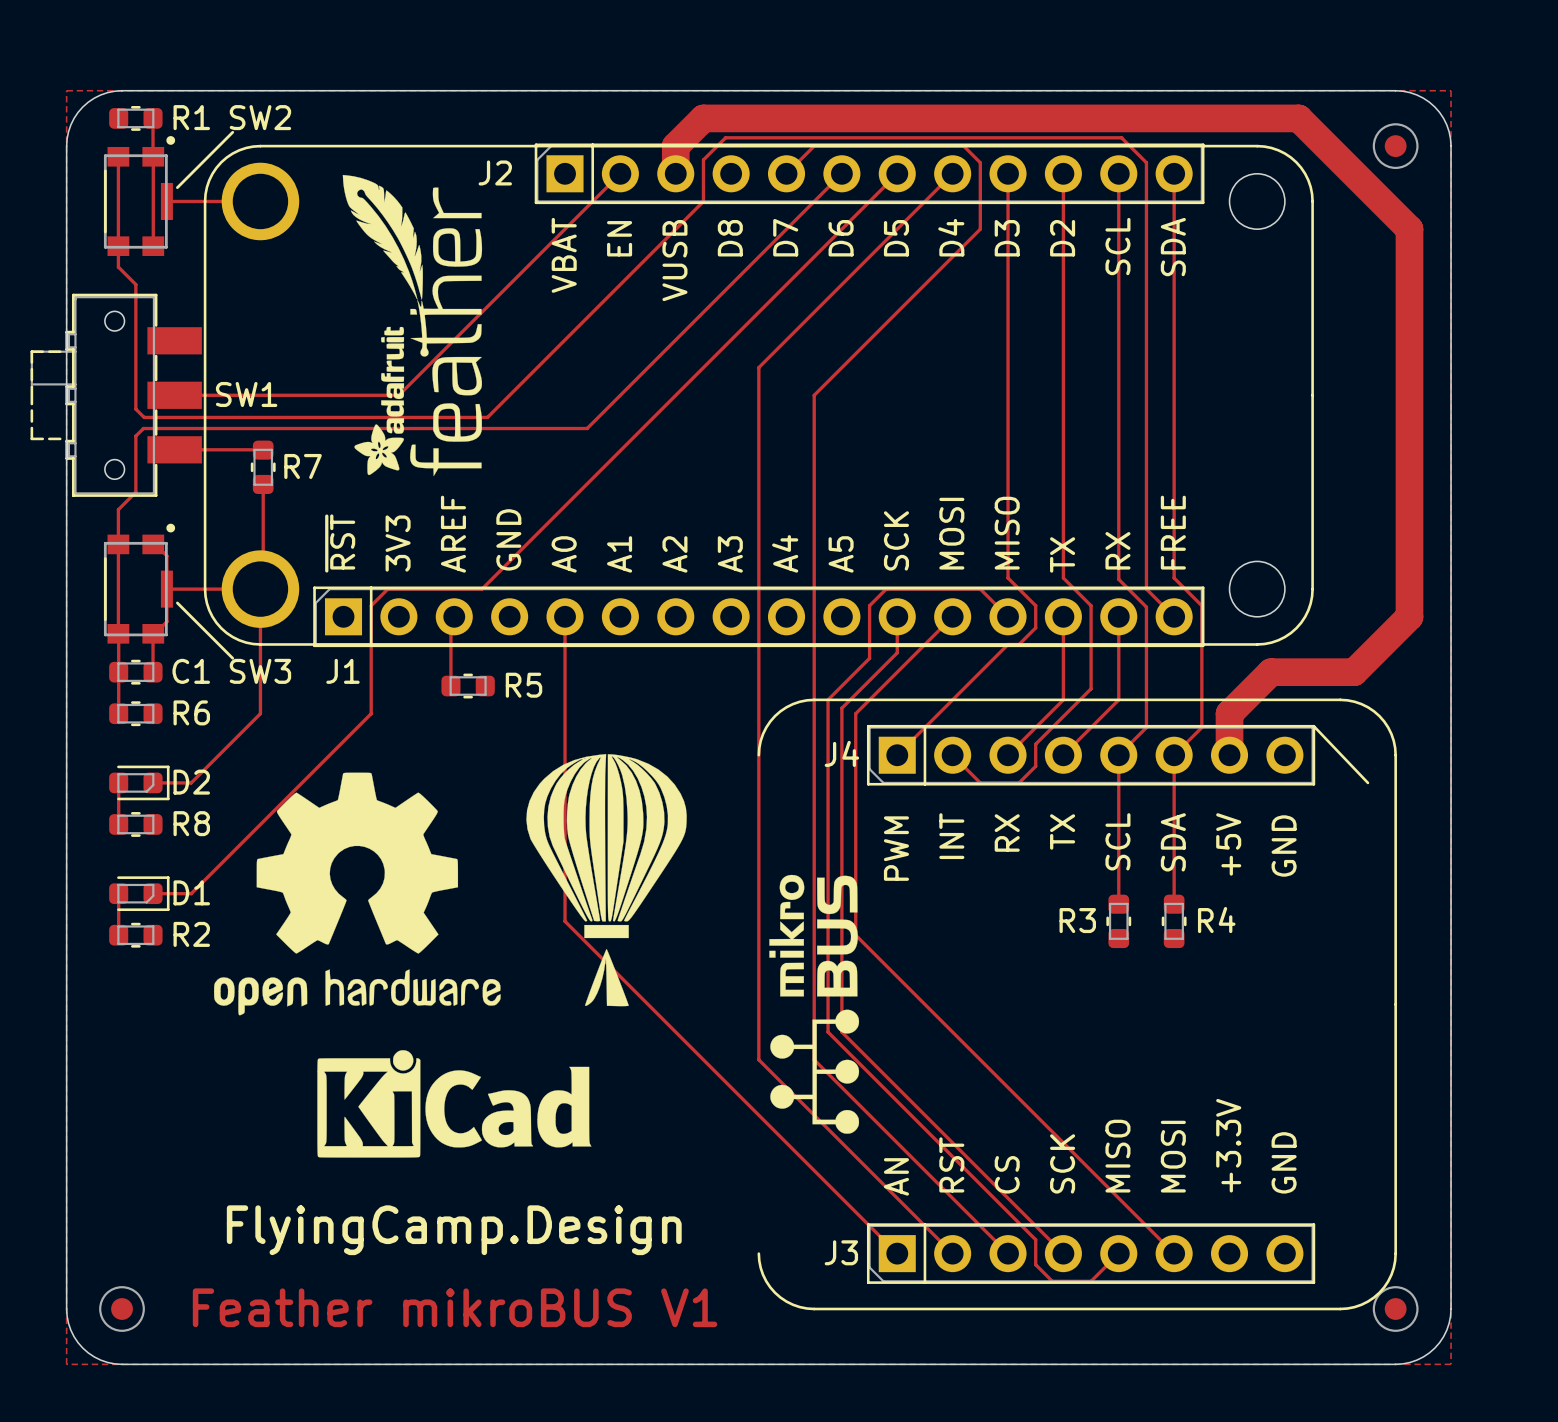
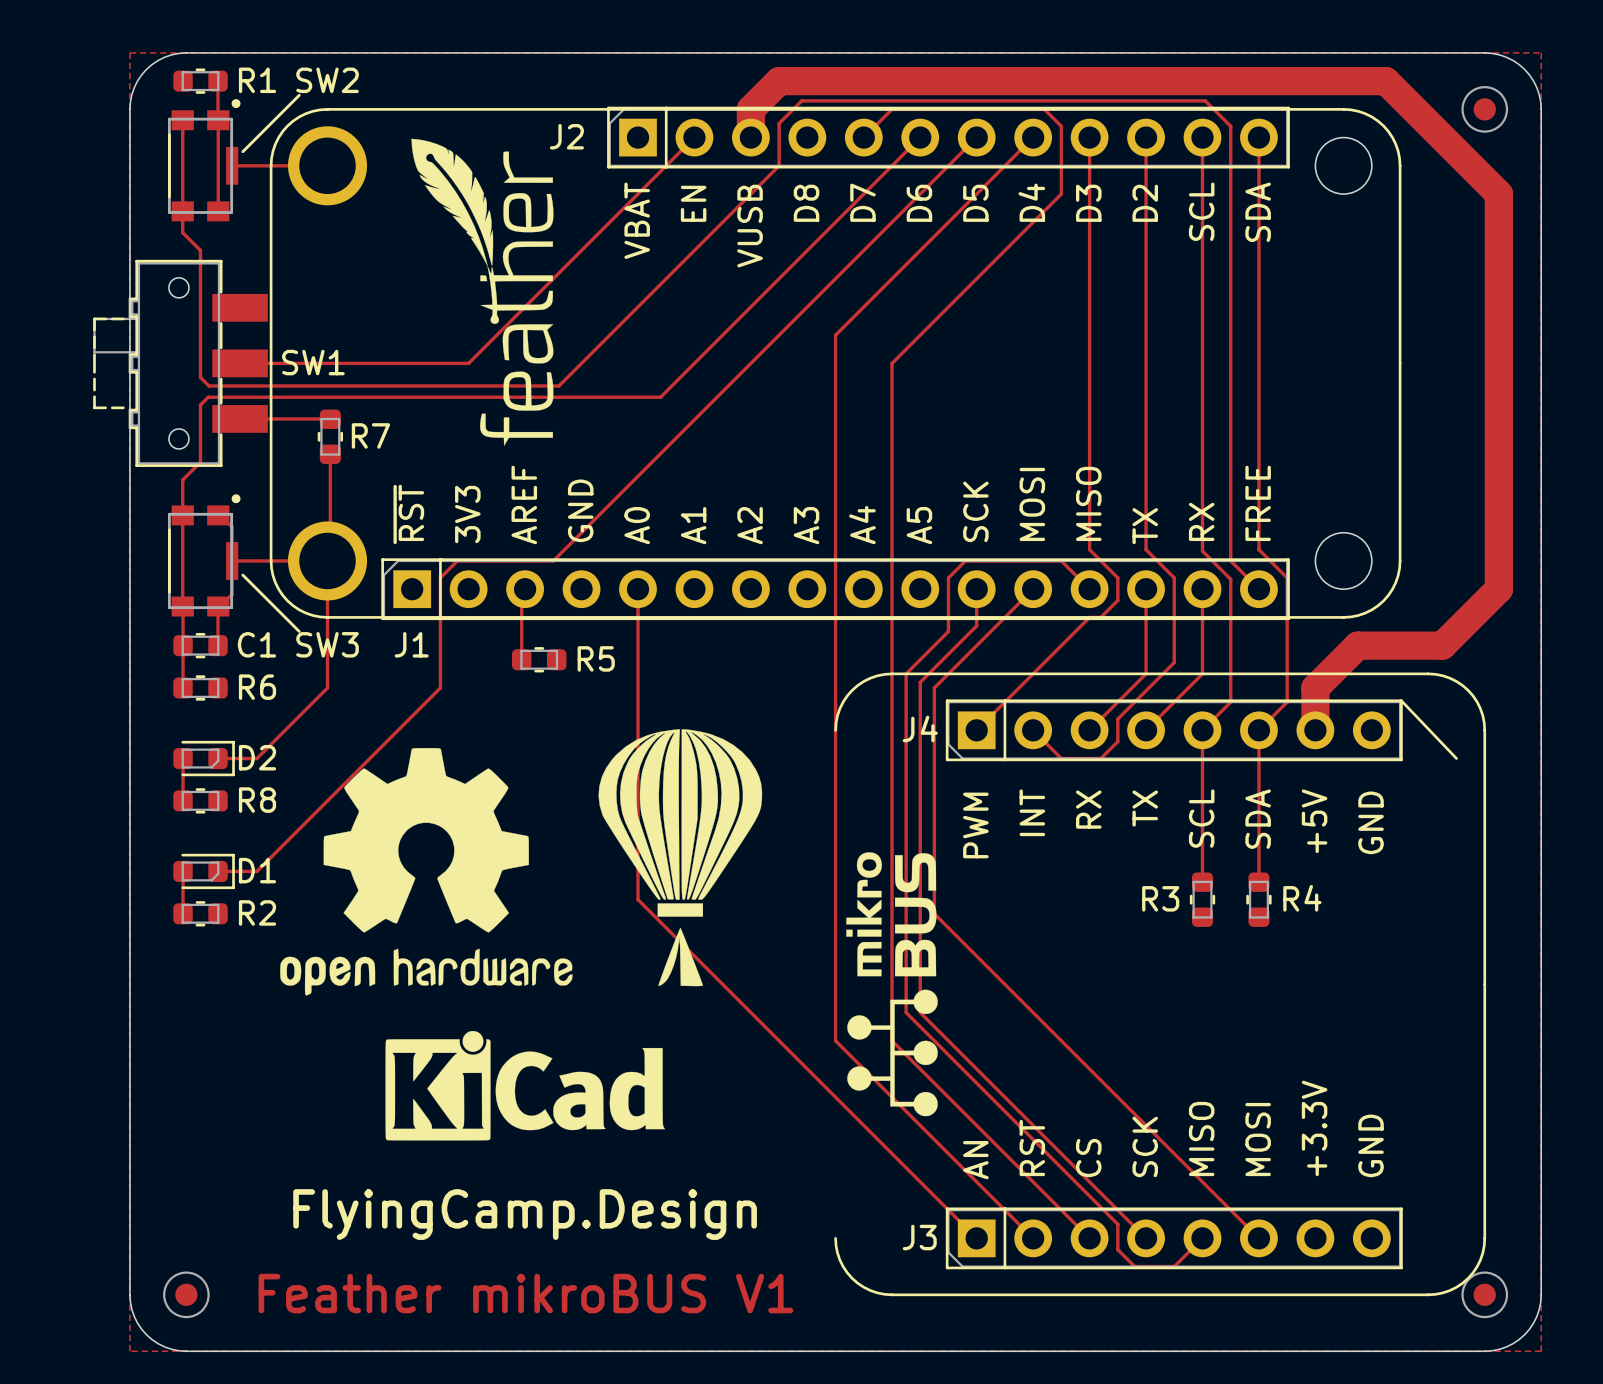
drawing shape: [342, 174, 483, 477] -> [411, 138, 554, 446]

